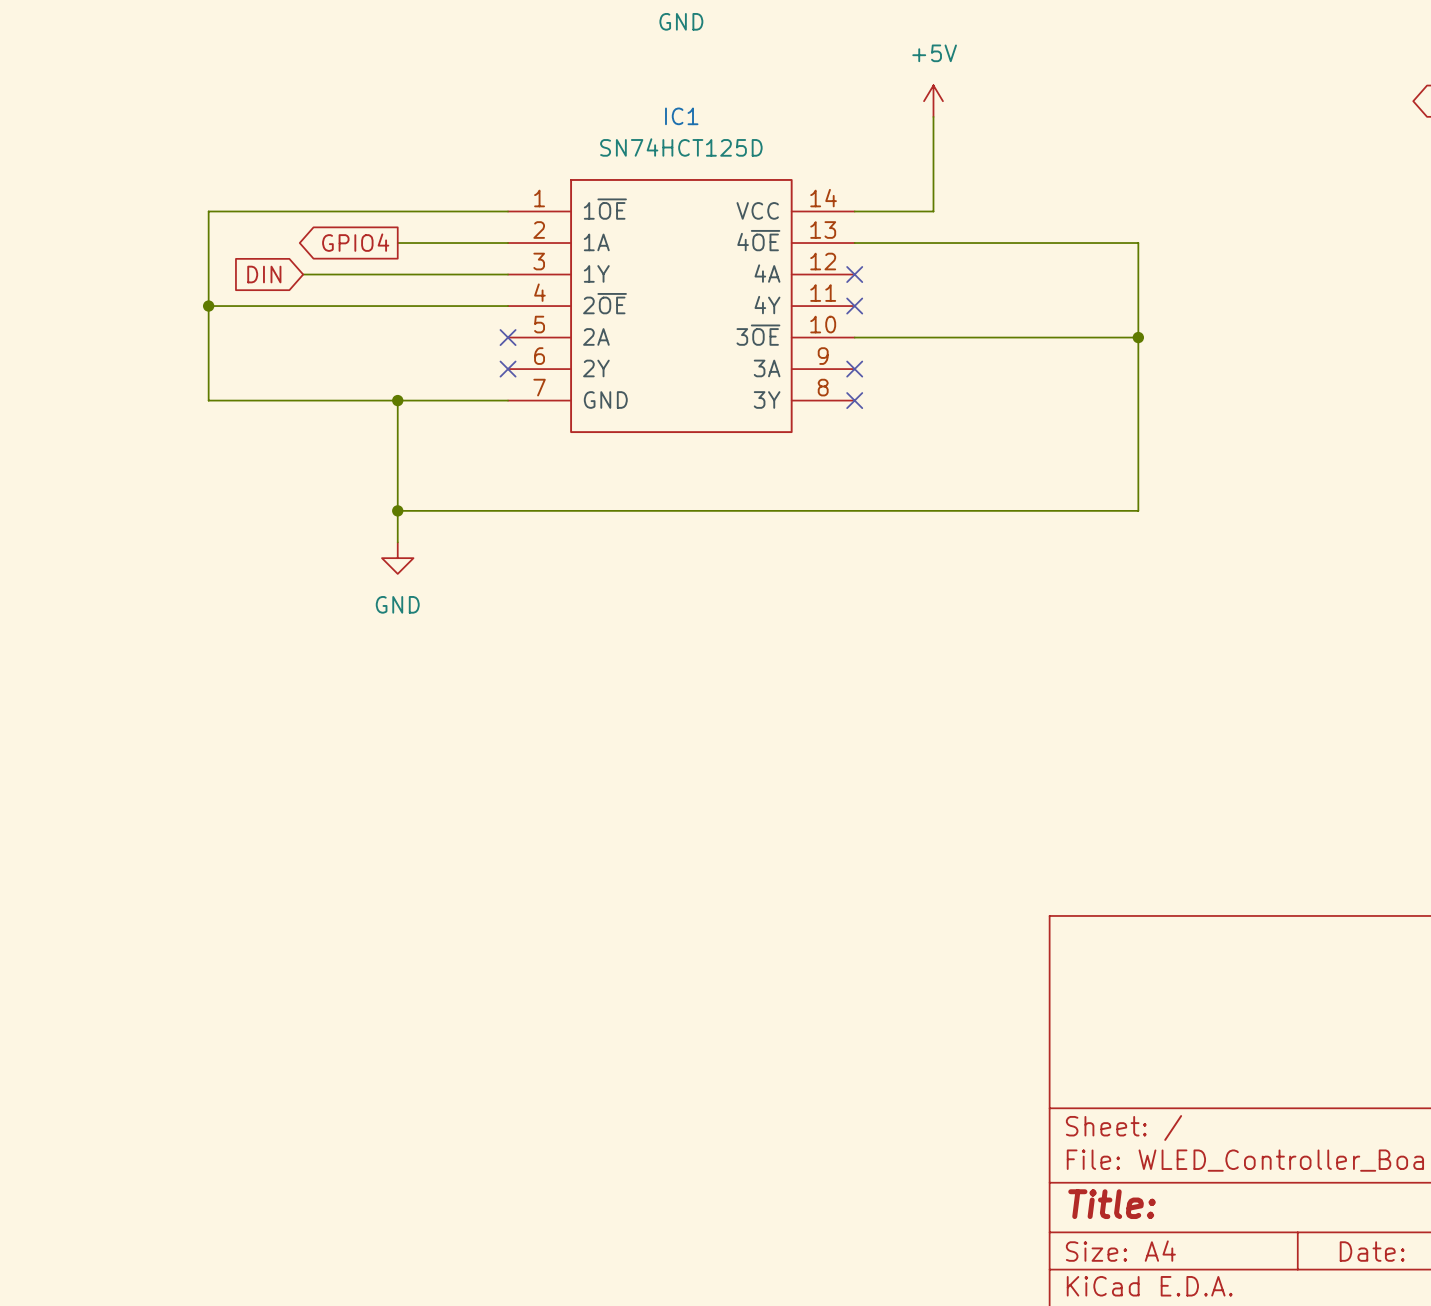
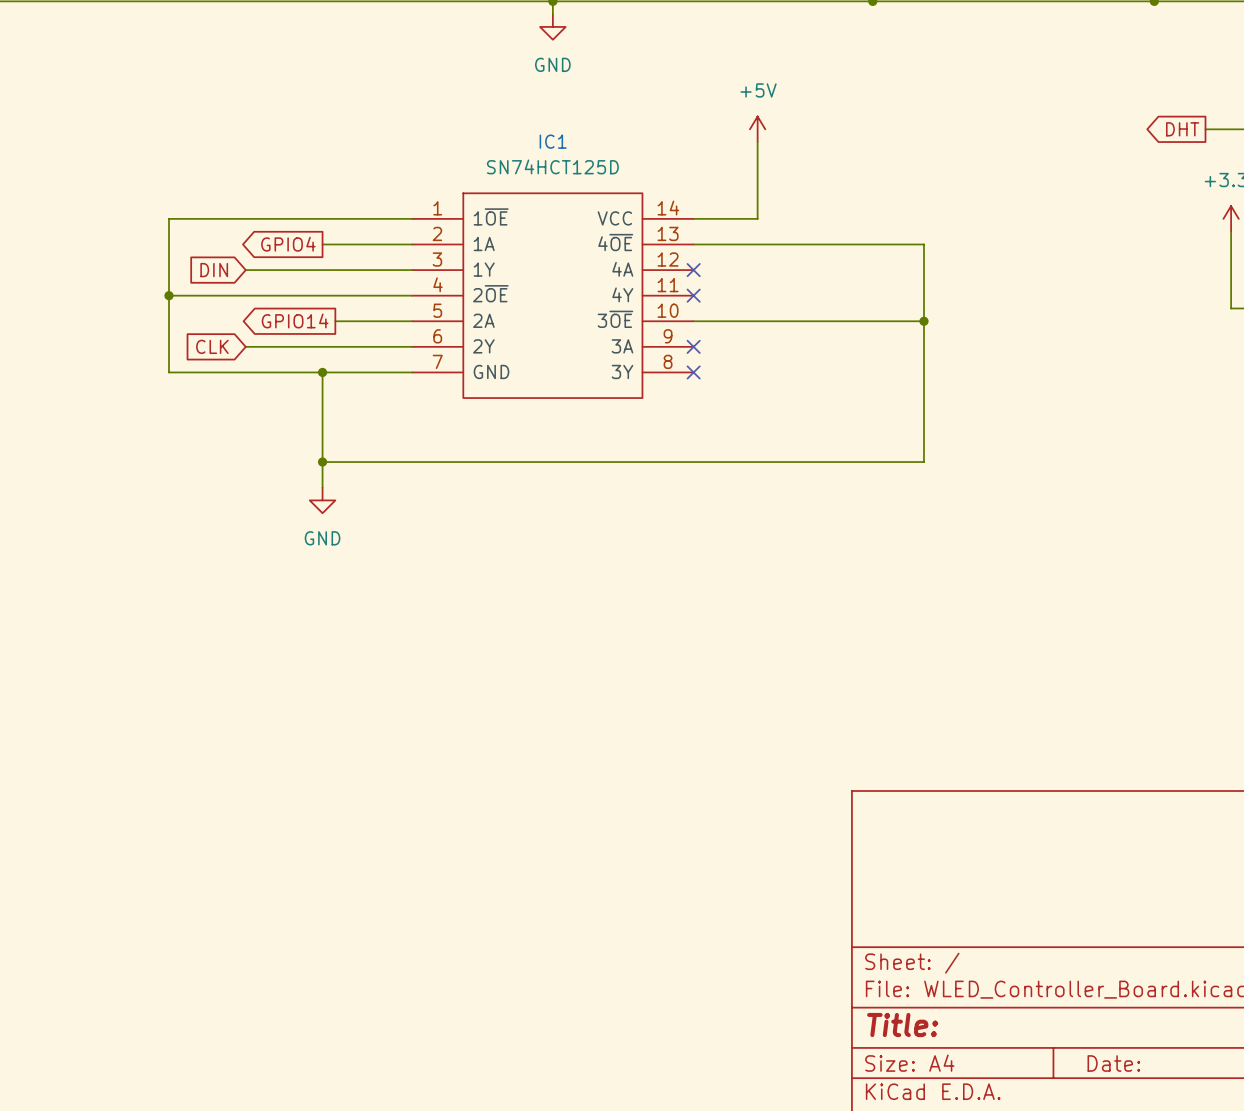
global label: none -> GPIO14 (295, 320)
wire: none -> (335, 321) (412, 321)
no-connect mark: (508, 337) -> none
global label: none -> CLK (212, 346)
wire: none -> (245, 346) (412, 346)
no-connect mark: (508, 369) -> none

